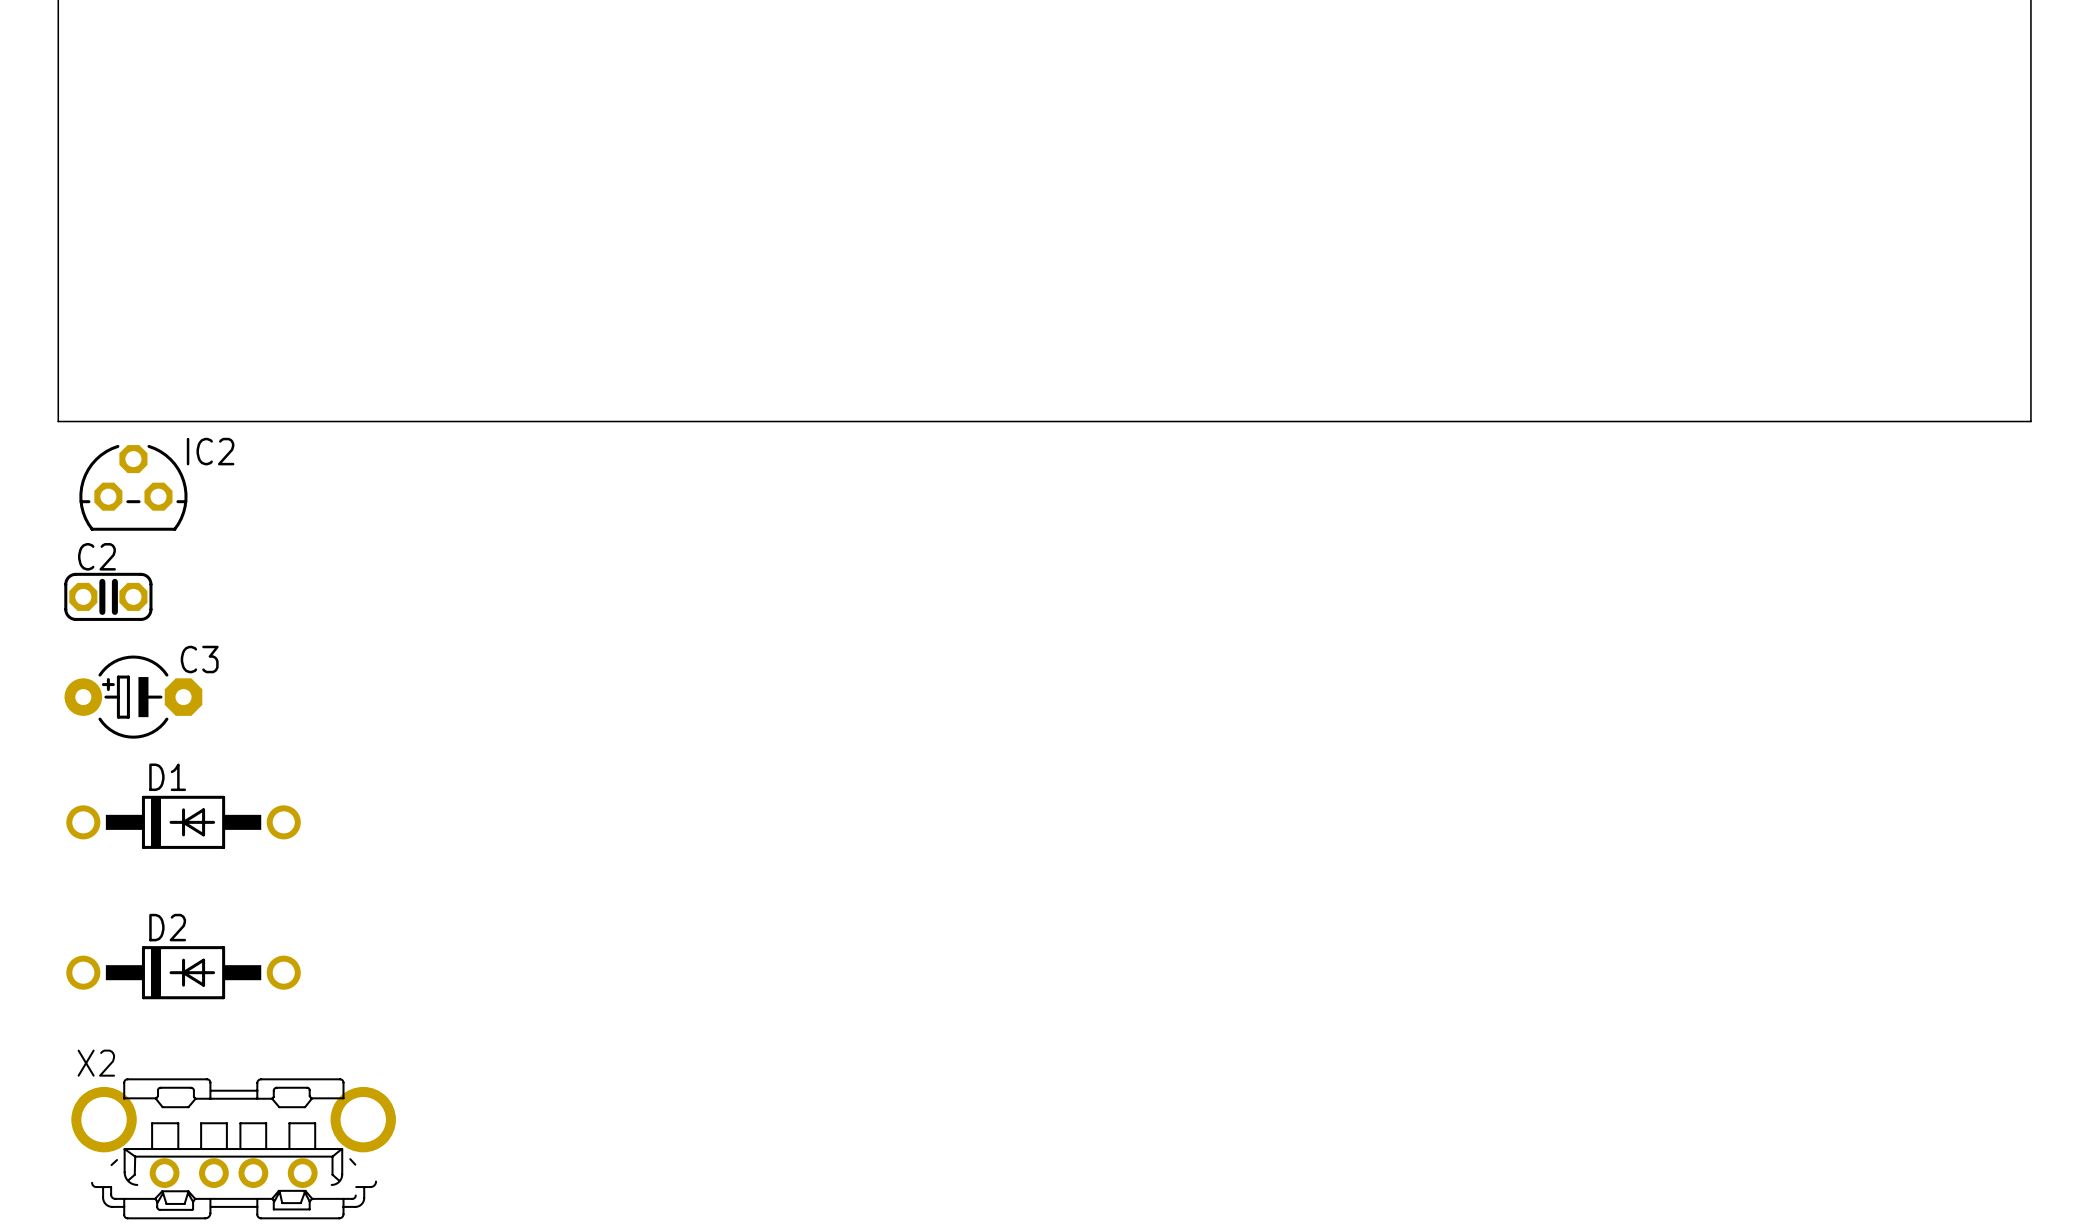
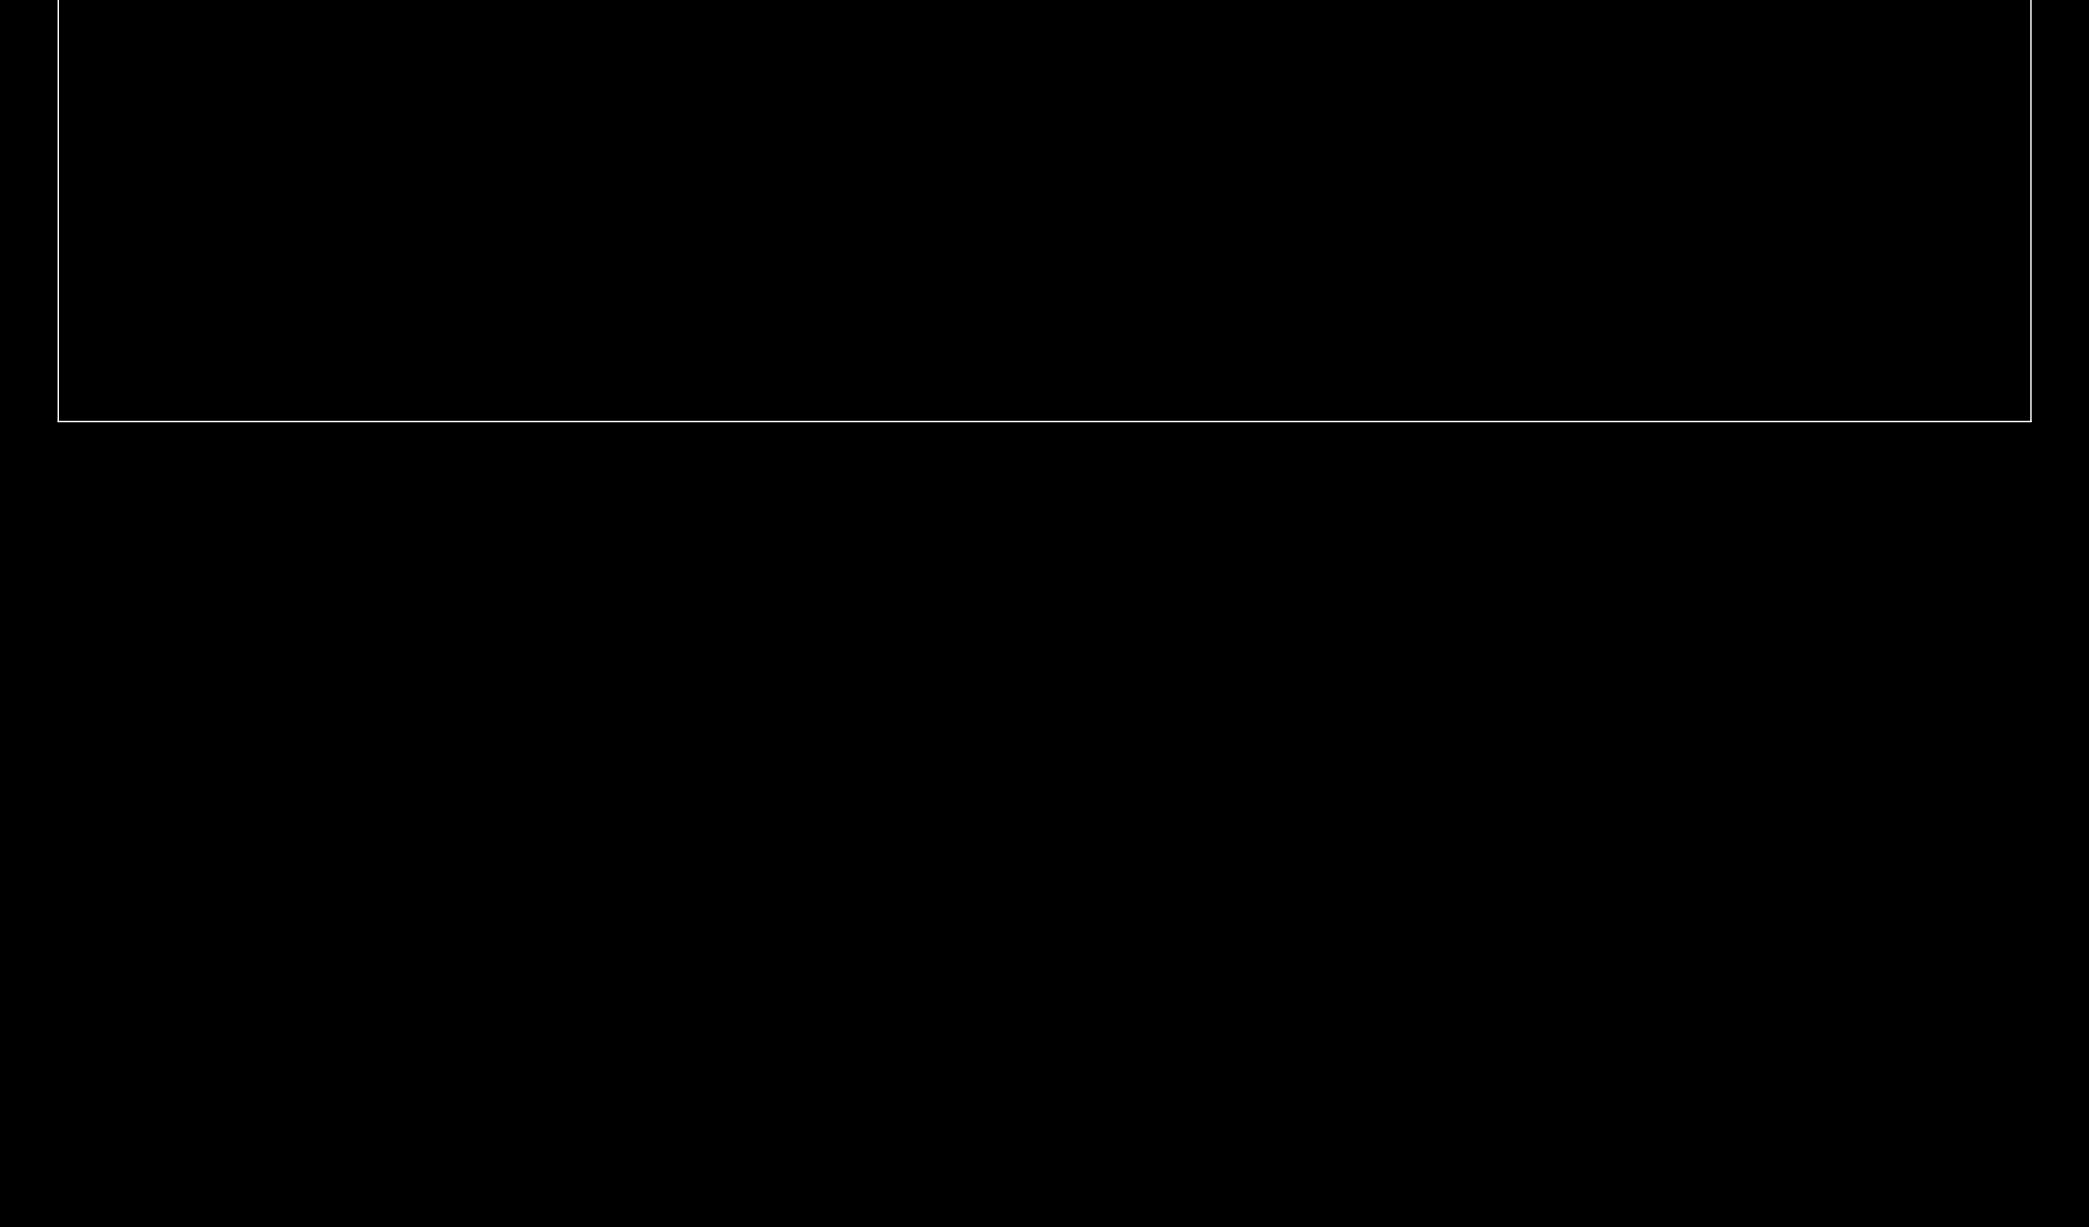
IC2: (133, 487) -> none
C2: (108, 596) -> none
C3: (133, 697) -> none
D1: (183, 822) -> none
D2: (183, 972) -> none
X2: (233, 1148) -> none

